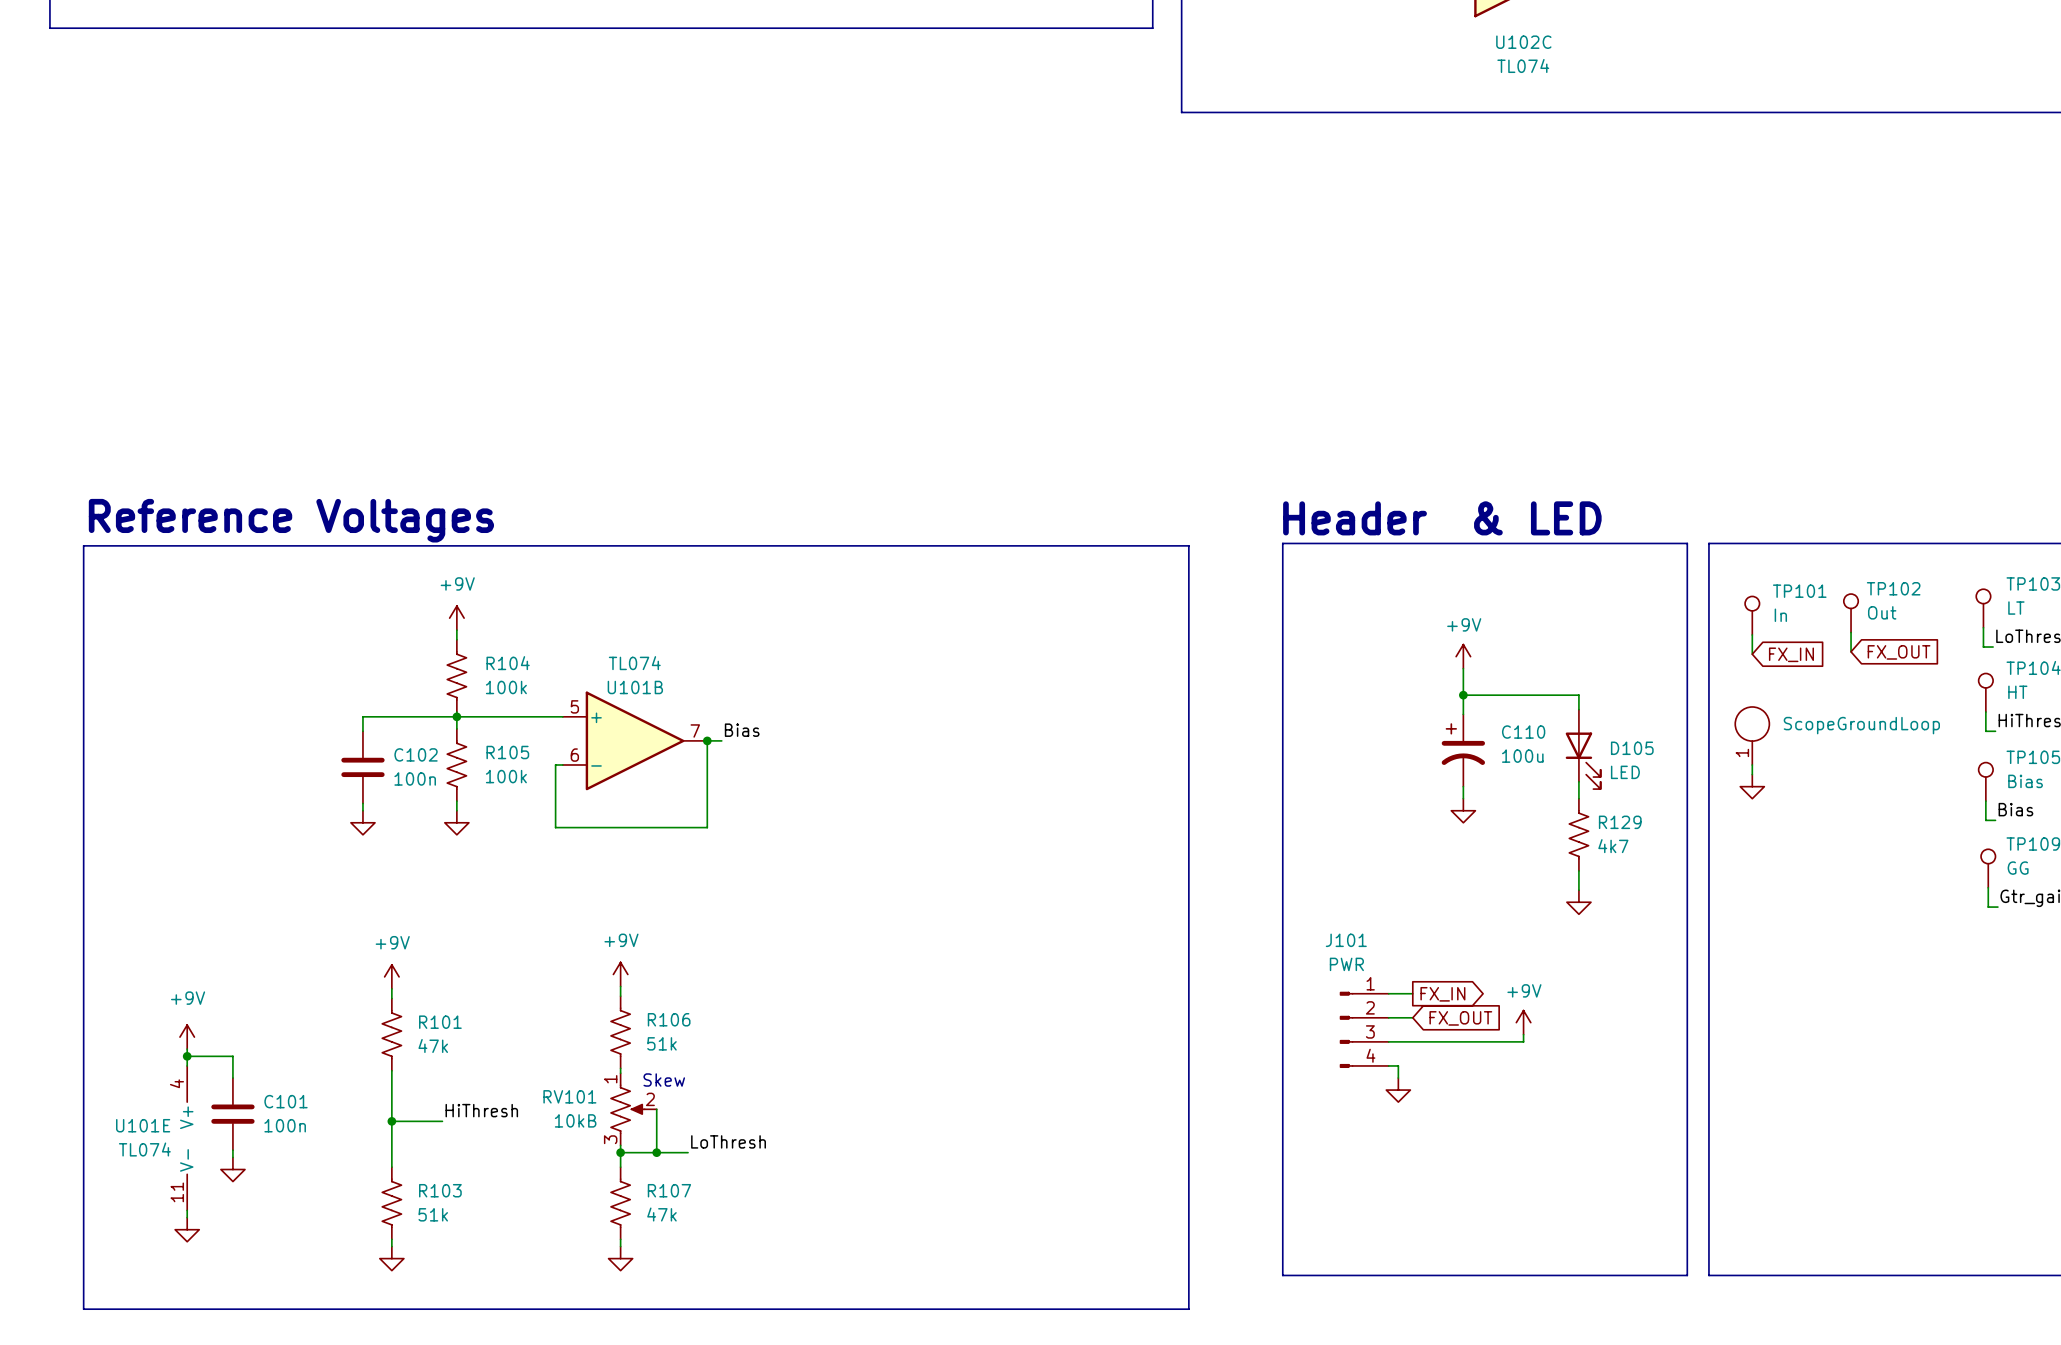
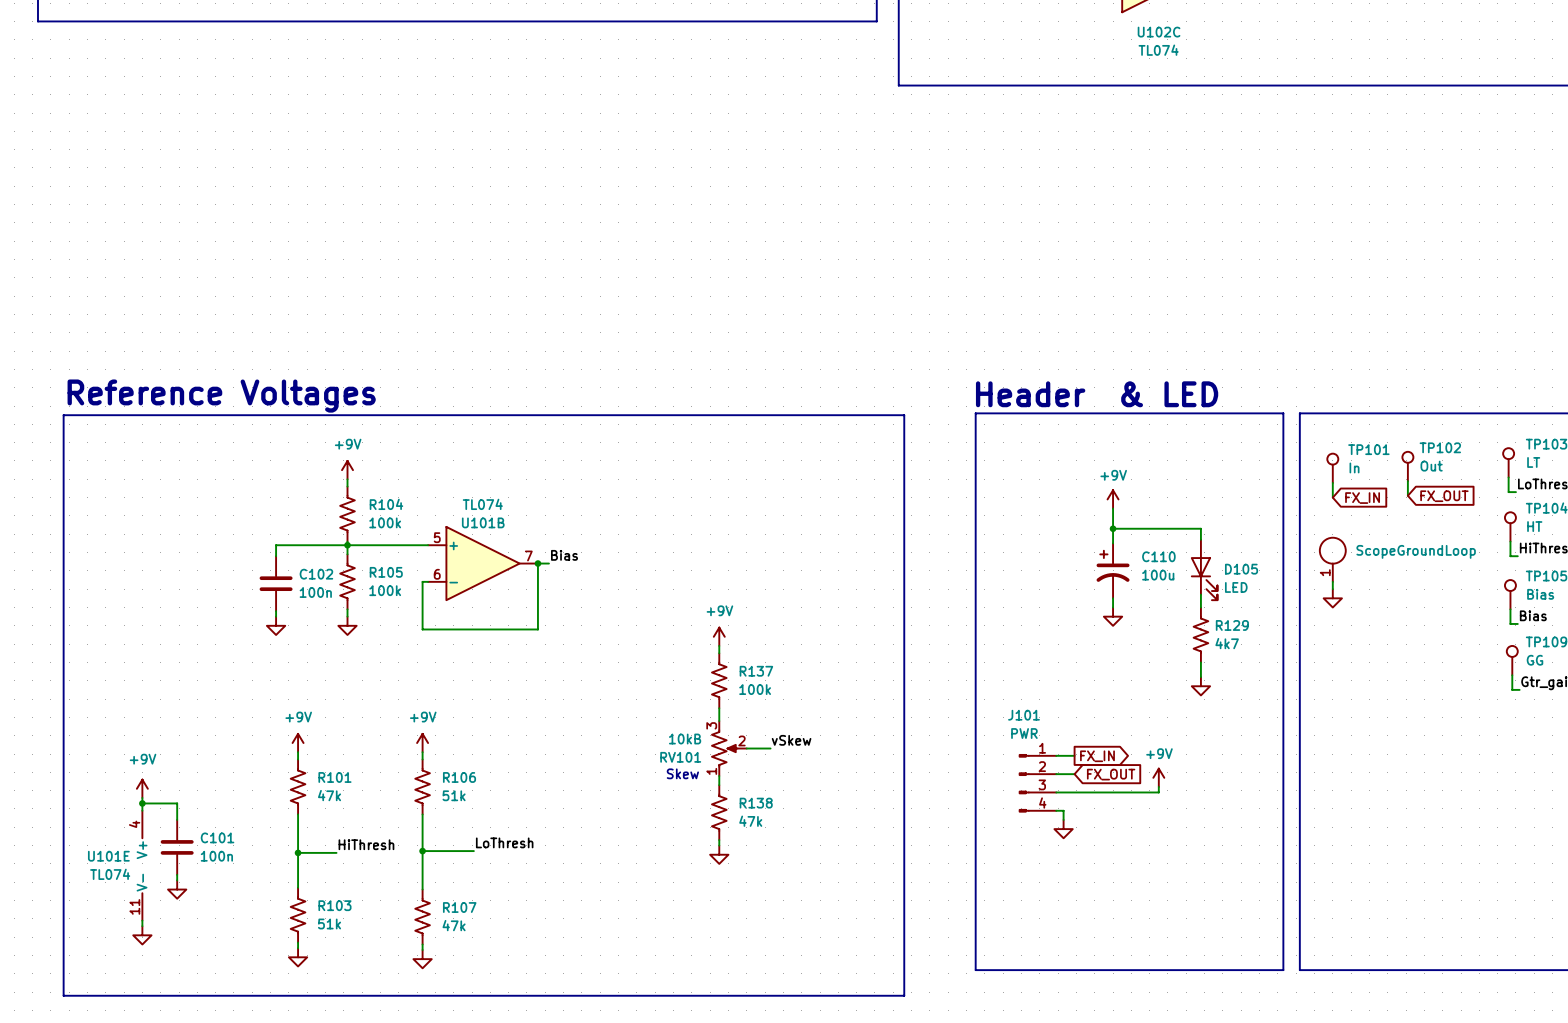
power symbol: none -> +9V (719, 636)
wire: none -> (719, 645) (719, 653)
R137: none -> 100k (719, 680)
wire: none -> (719, 708) (719, 721)
label: none -> vSkew (791, 740)
power symbol position: +9V (620, 974) -> +9V (422, 743)
wire: none -> (746, 748) (770, 748)
wire: (620, 986) (620, 996) -> (422, 752) (422, 759)
text: none -> Skew (682, 773)
wire: none -> (719, 775) (719, 785)
R106 position: (620, 1032) -> (422, 786)
wire: (620, 1068) (620, 1073) -> none
R138: none -> 47k (719, 812)
wire: none -> (422, 814) (422, 889)
text: Skew (664, 1080) -> none
wire: none -> (719, 840) (719, 845)
RV101 flip: as is (627, 1109) -> up-down (724, 748)
RV101 position: (633, 1109) -> (729, 748)
wire: (656, 1109) (656, 1152) -> none
junction: none -> (422, 851)
power symbol: none -> (719, 854)
label position: LoThresh (728, 1141) -> LoThresh (504, 842)
wire: (620, 1145) (620, 1167) -> none
wire: (620, 1152) (688, 1152) -> (422, 851) (473, 851)
junction: (620, 1152) -> none
junction: (656, 1152) -> none
R107 position: (620, 1203) -> (422, 917)
wire: (620, 1239) (620, 1246) -> (422, 944) (422, 949)
power symbol position: (620, 1258) -> (422, 959)

